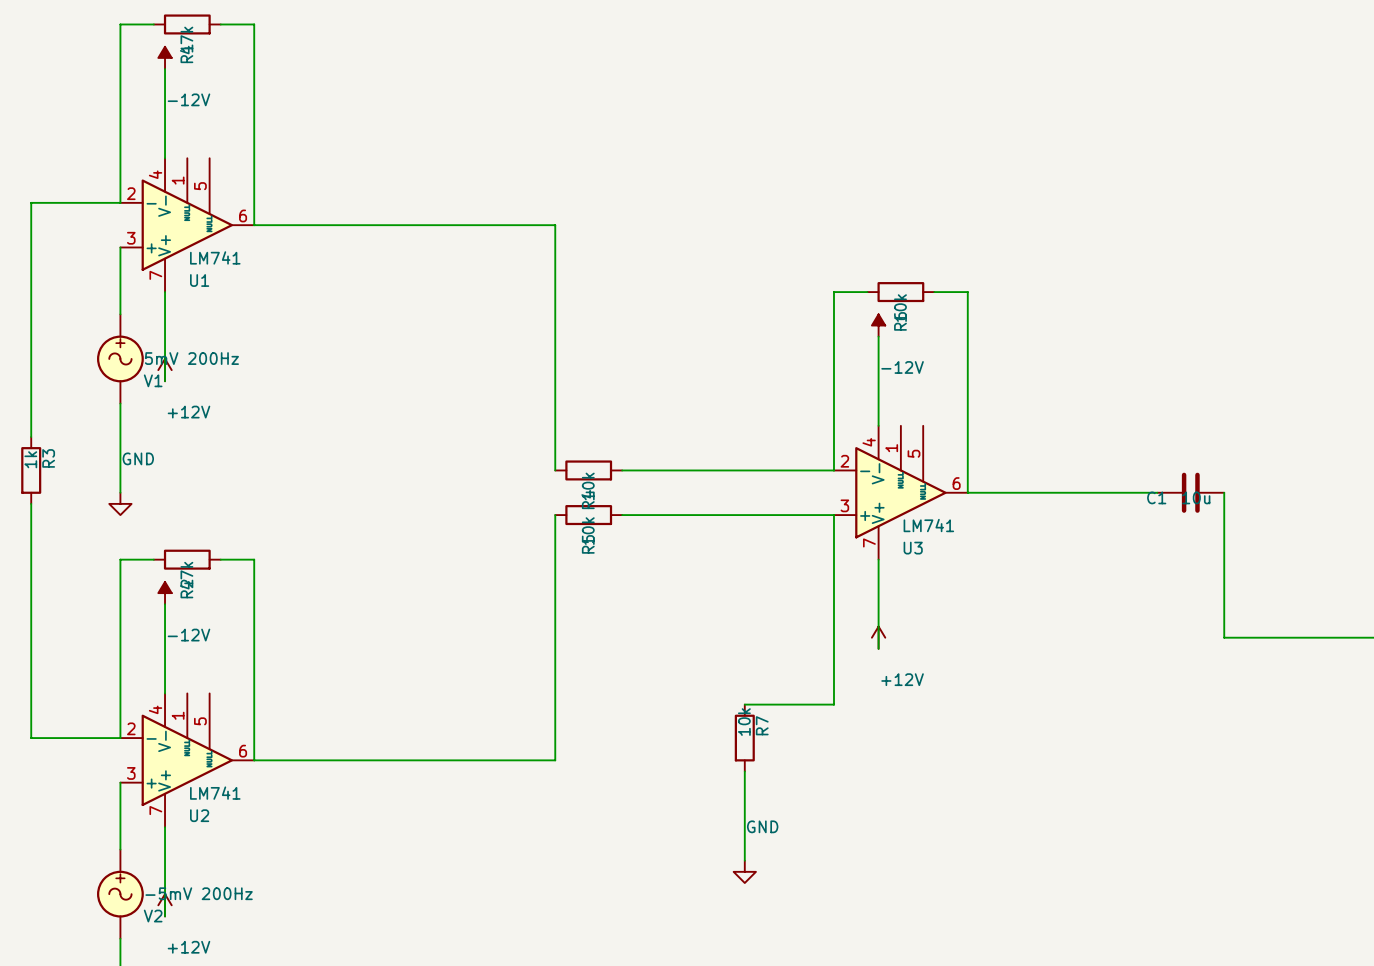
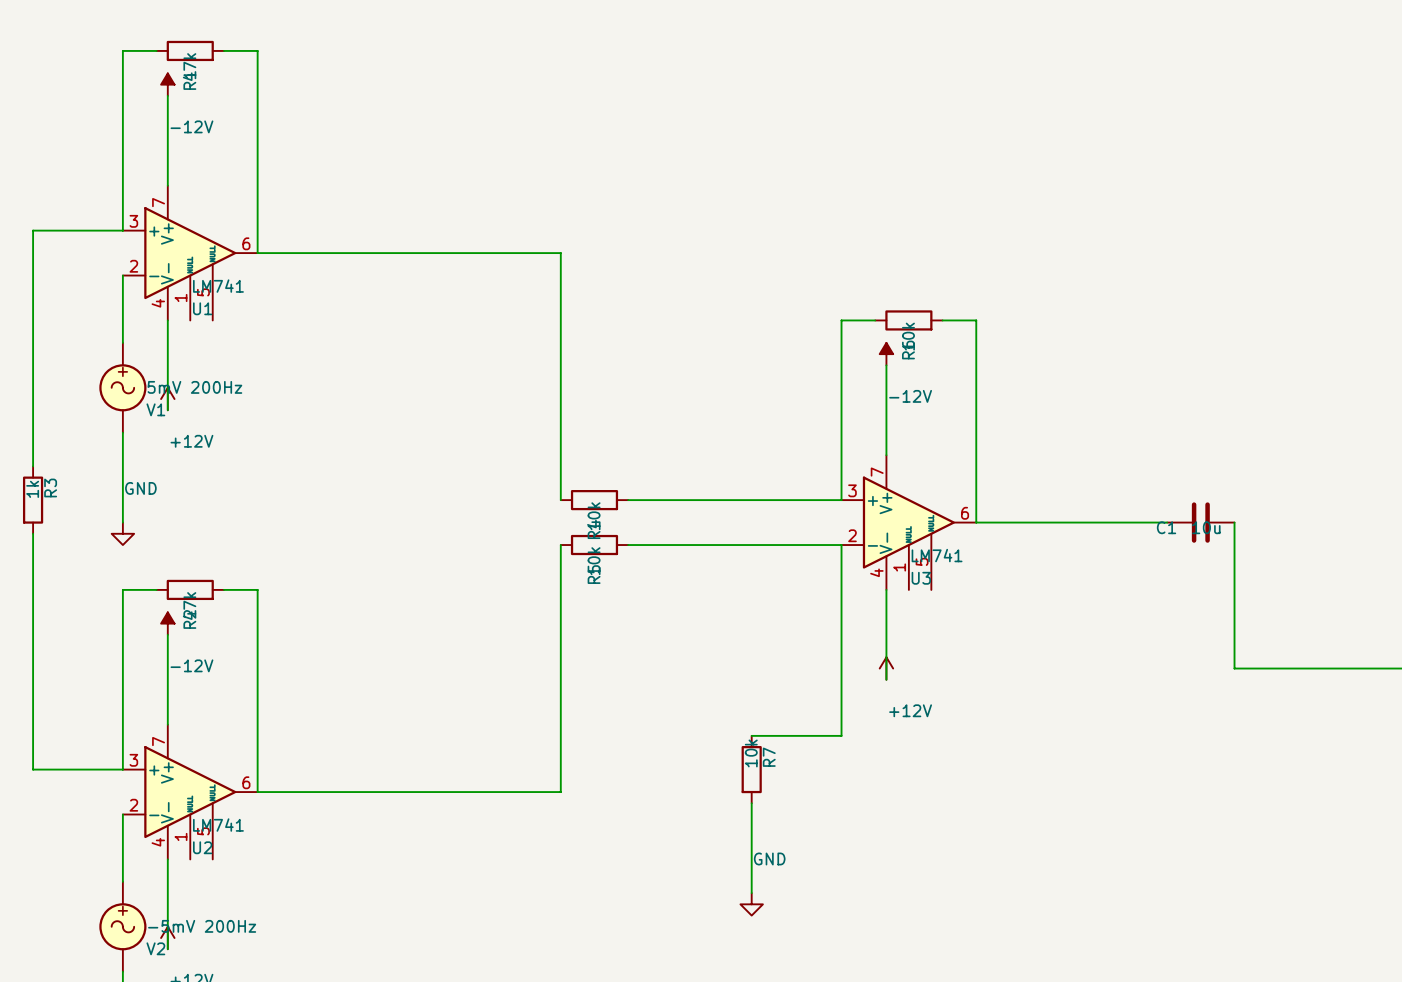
U1 flip: as is (187, 225) -> up-down (190, 253)
U3 flip: as is (900, 492) -> up-down (908, 522)
U2 flip: as is (187, 760) -> up-down (190, 792)

